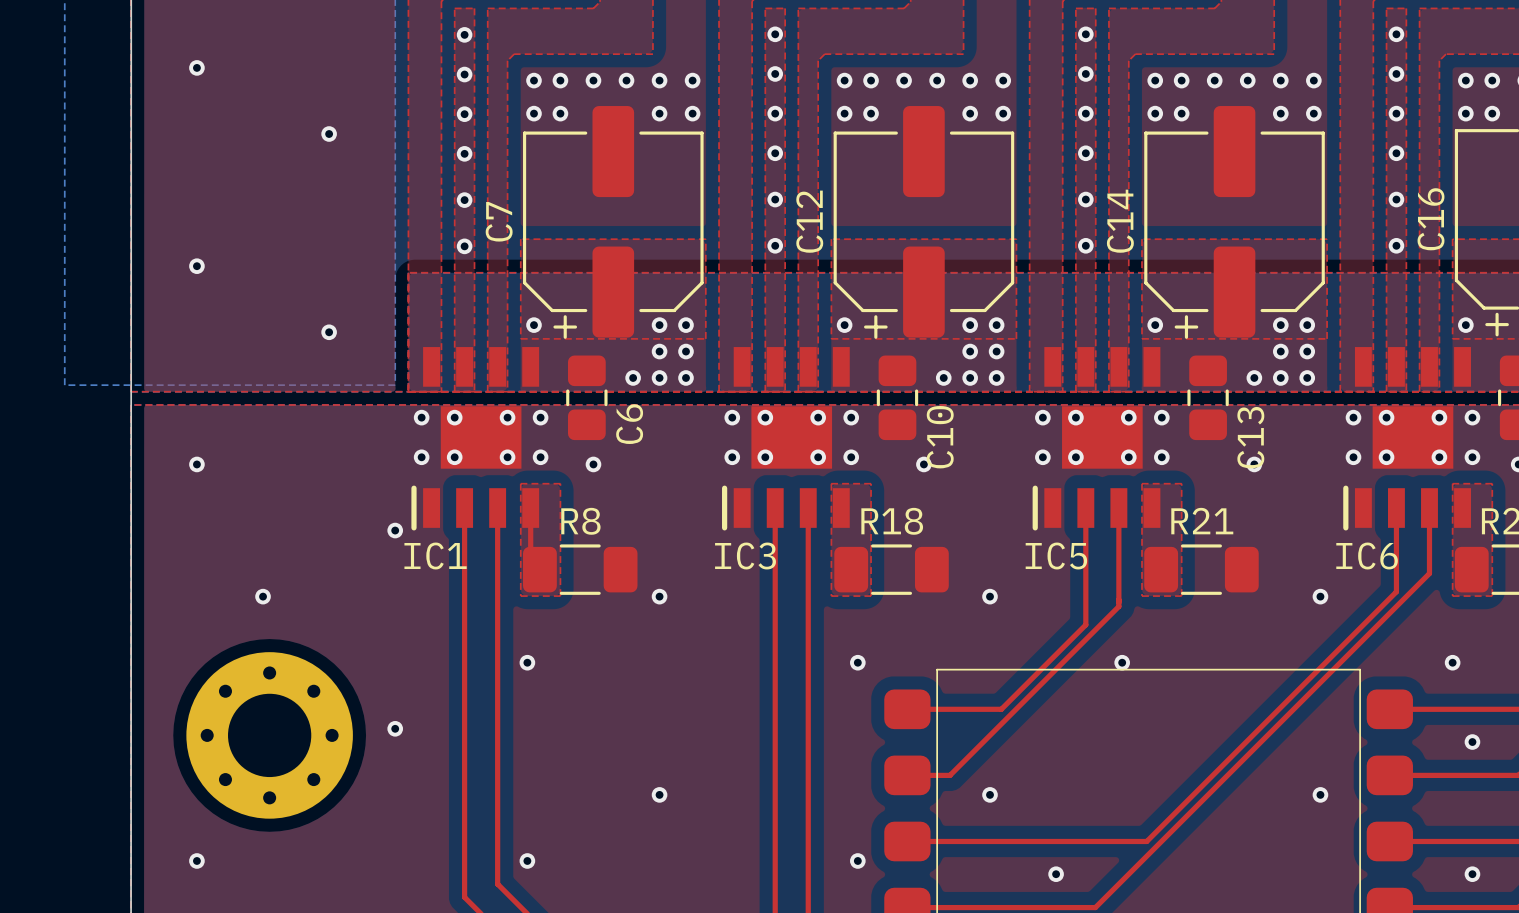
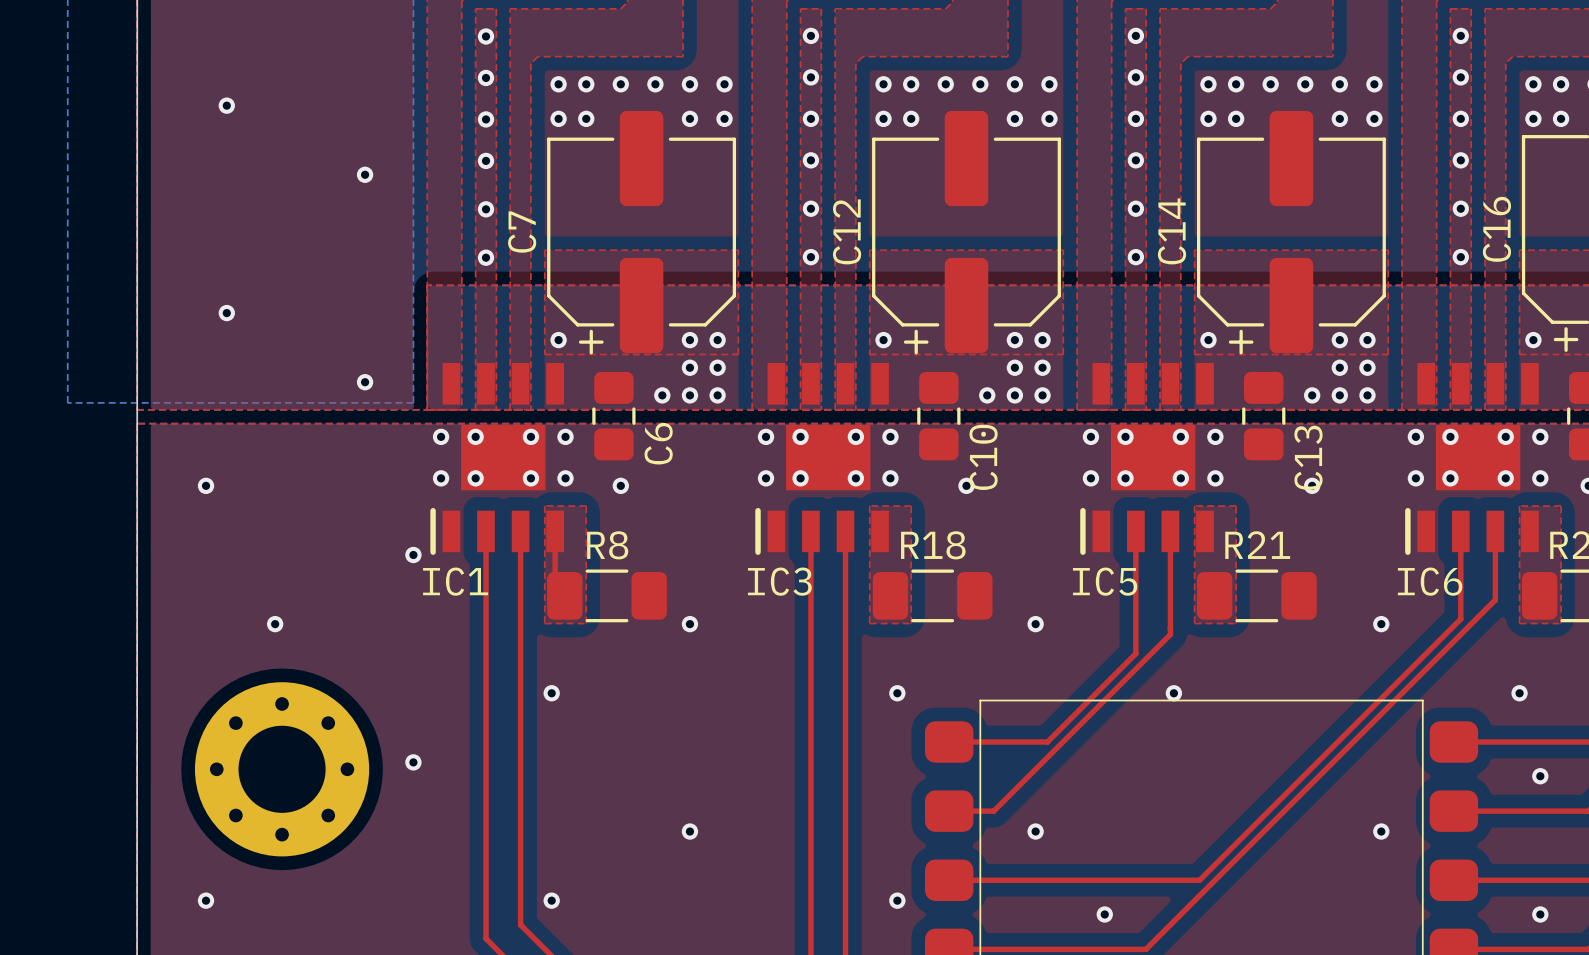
via position: (196, 67) -> (226, 105)
via position: (329, 134) -> (365, 174)
via position: (196, 266) -> (226, 313)
via position: (329, 332) -> (365, 382)

